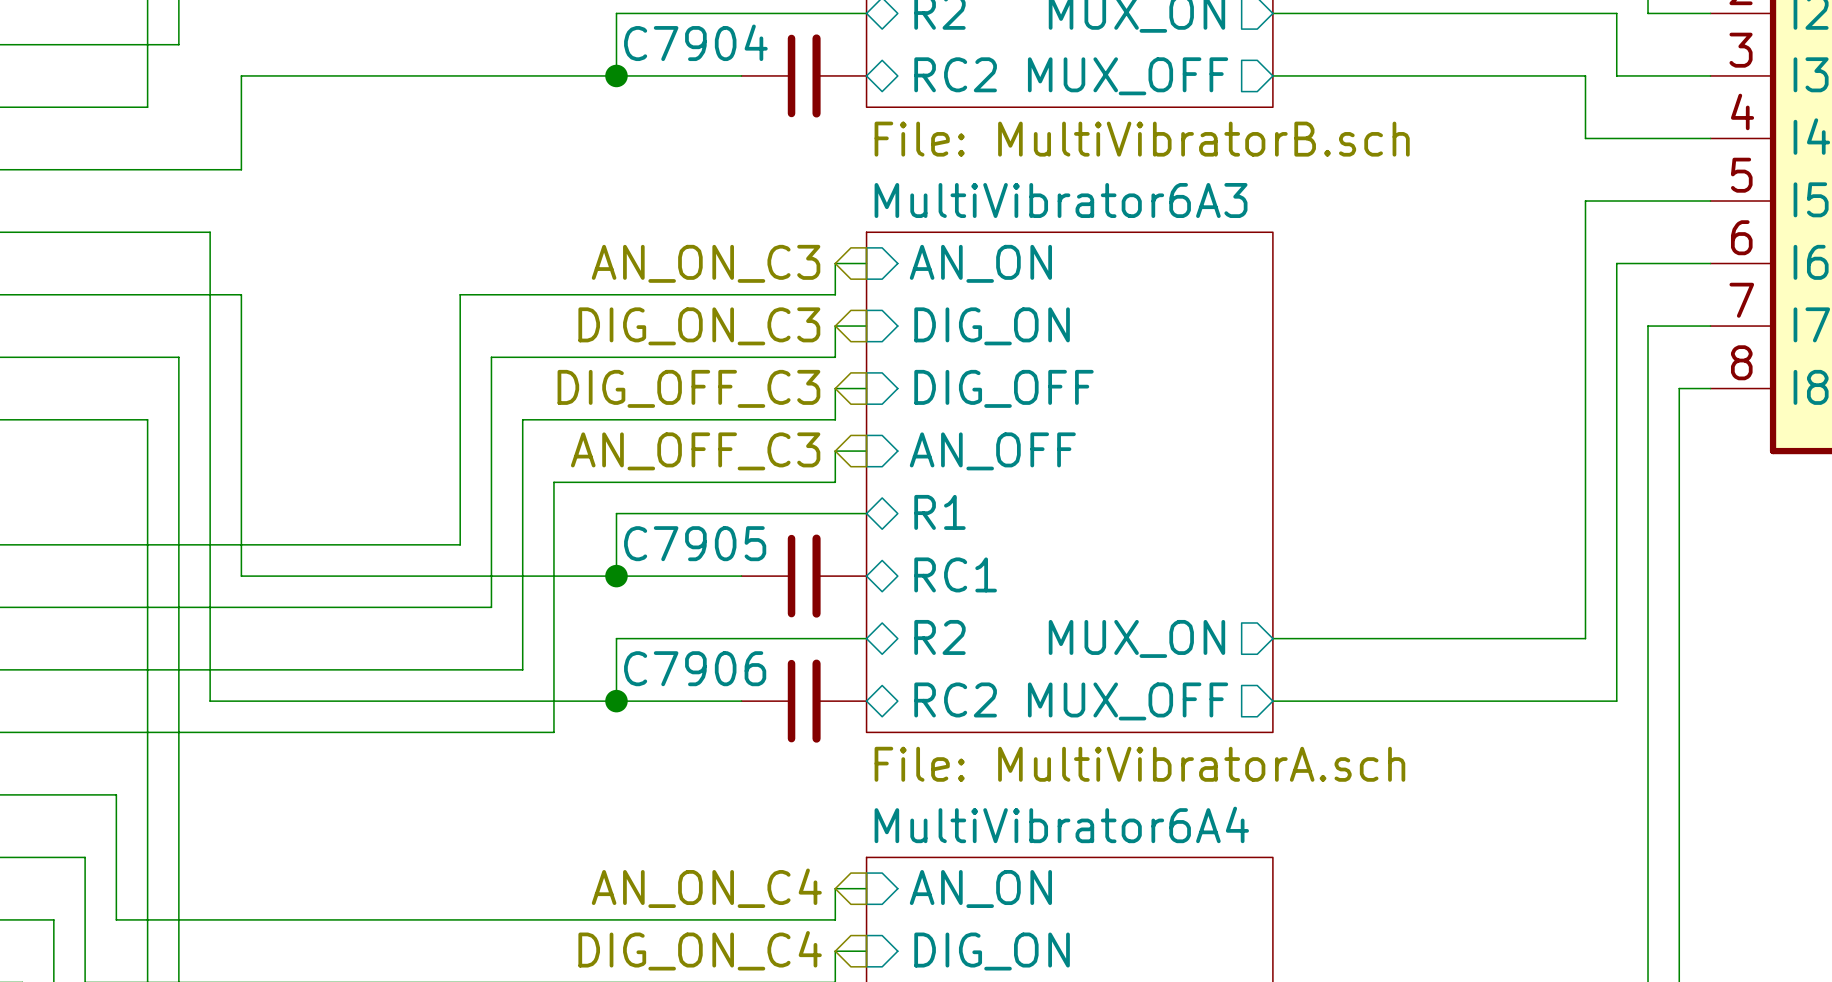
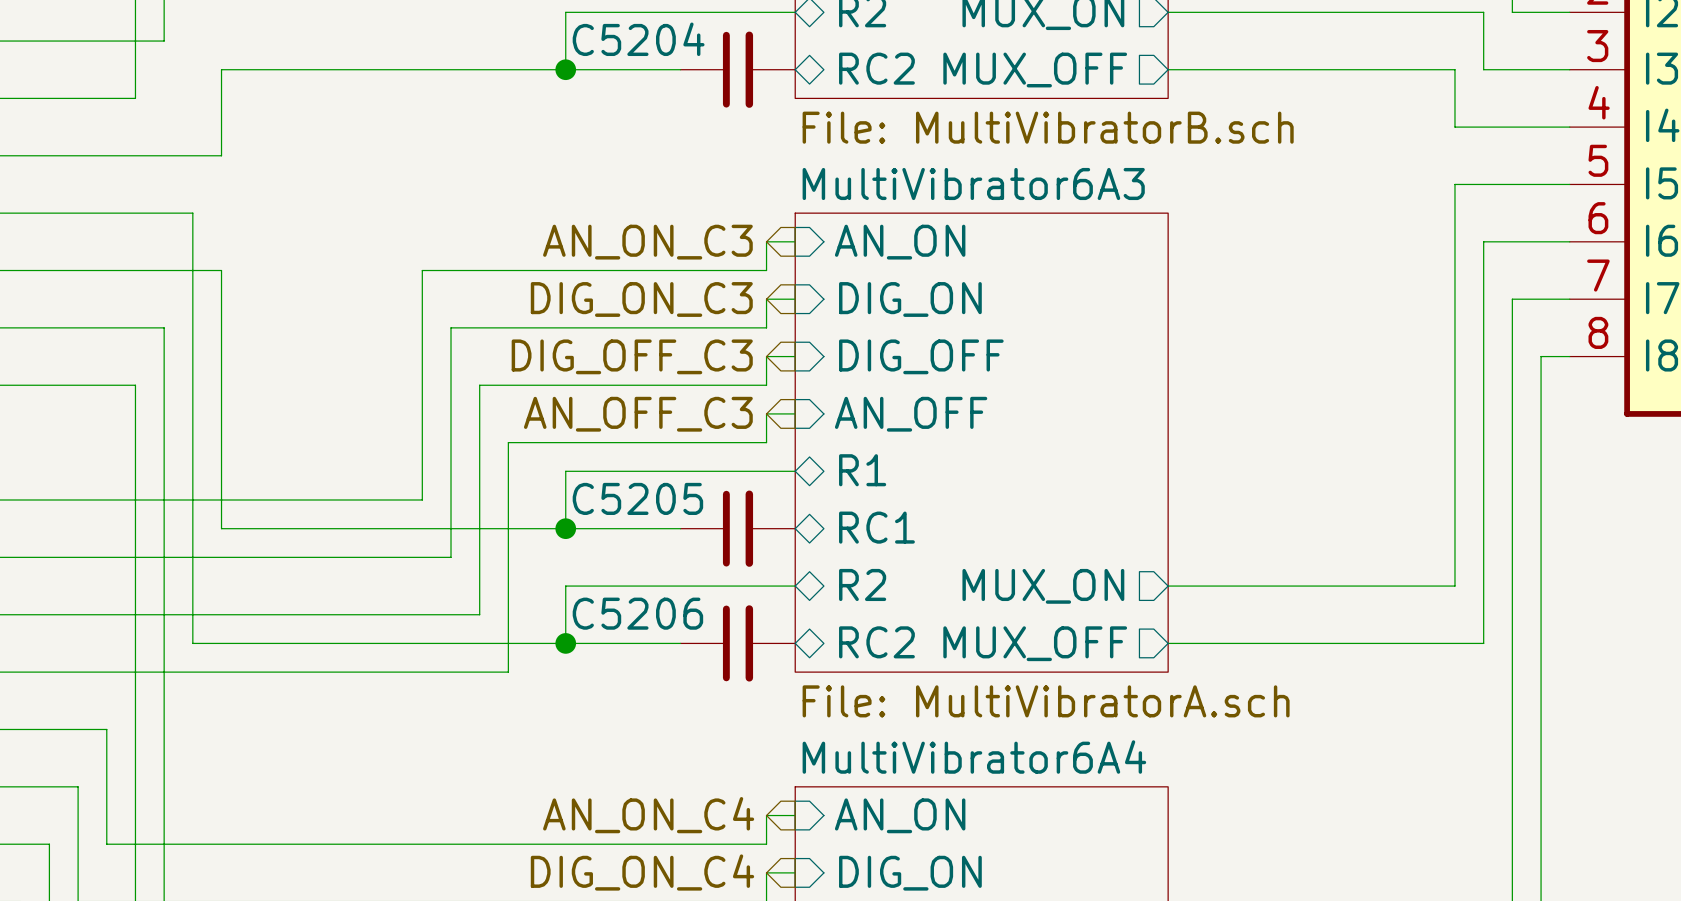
C7904 name: C7904 (695, 42) -> C5204 (638, 39)
C7905 name: C7905 (695, 543) -> C5205 (637, 498)
C7906 name: C7906 (695, 668) -> C5206 (637, 613)

